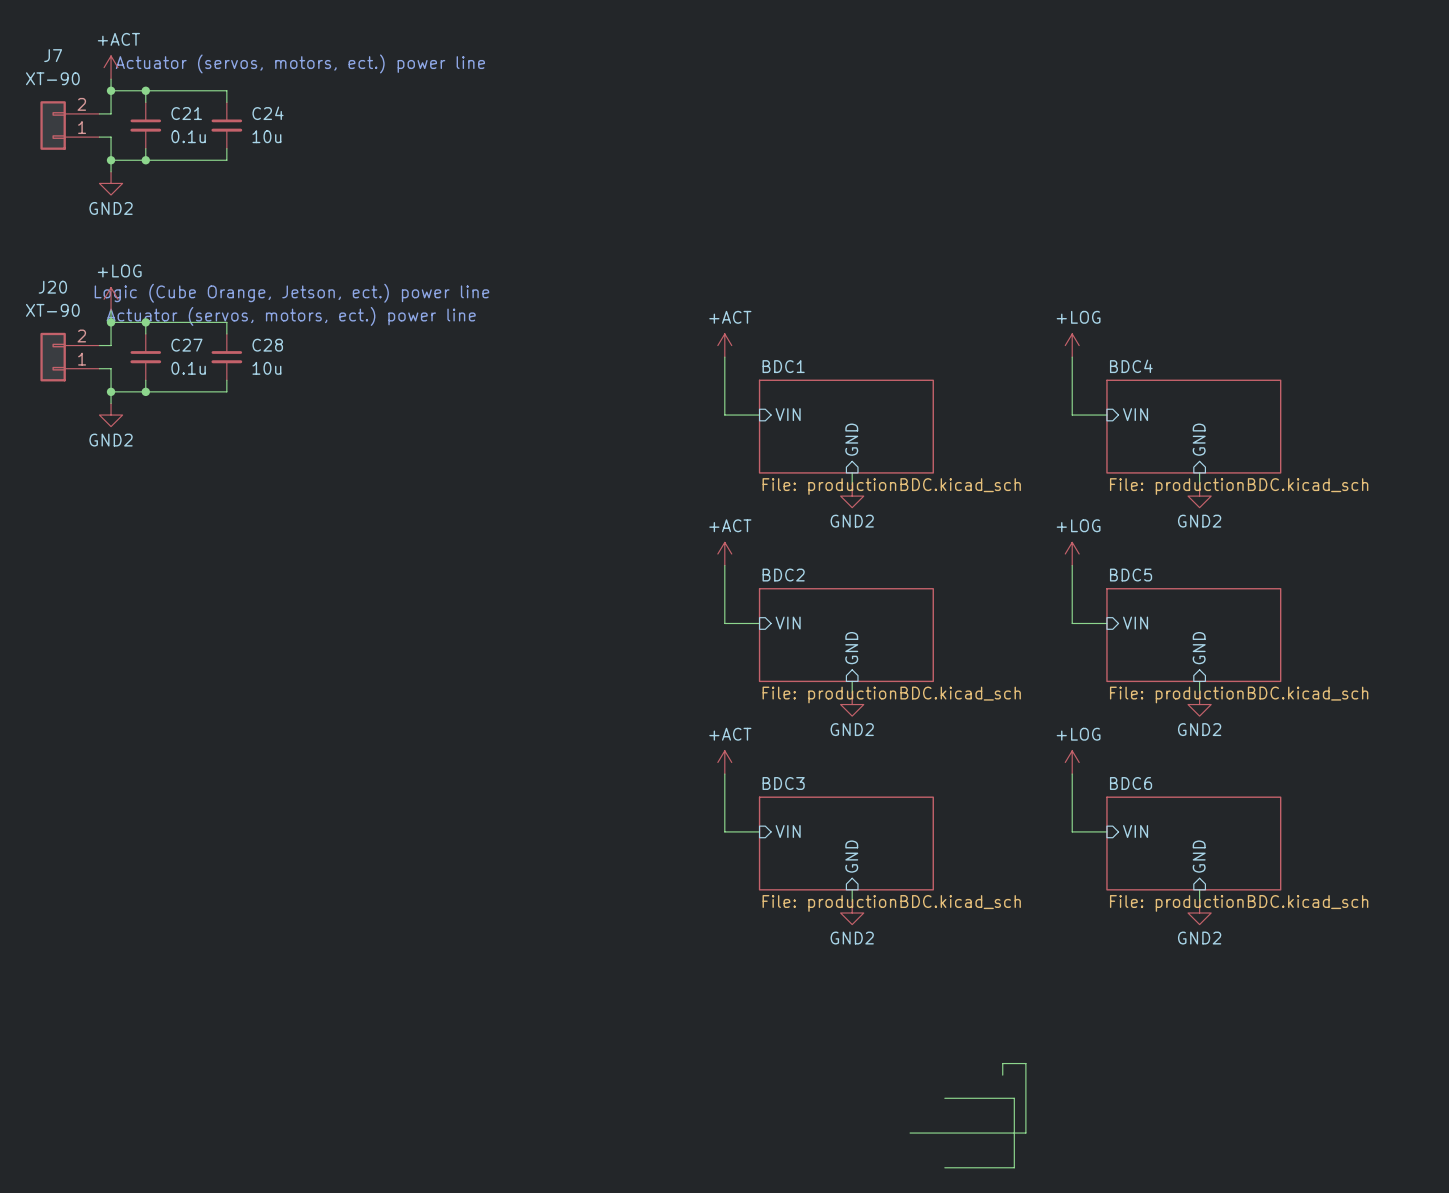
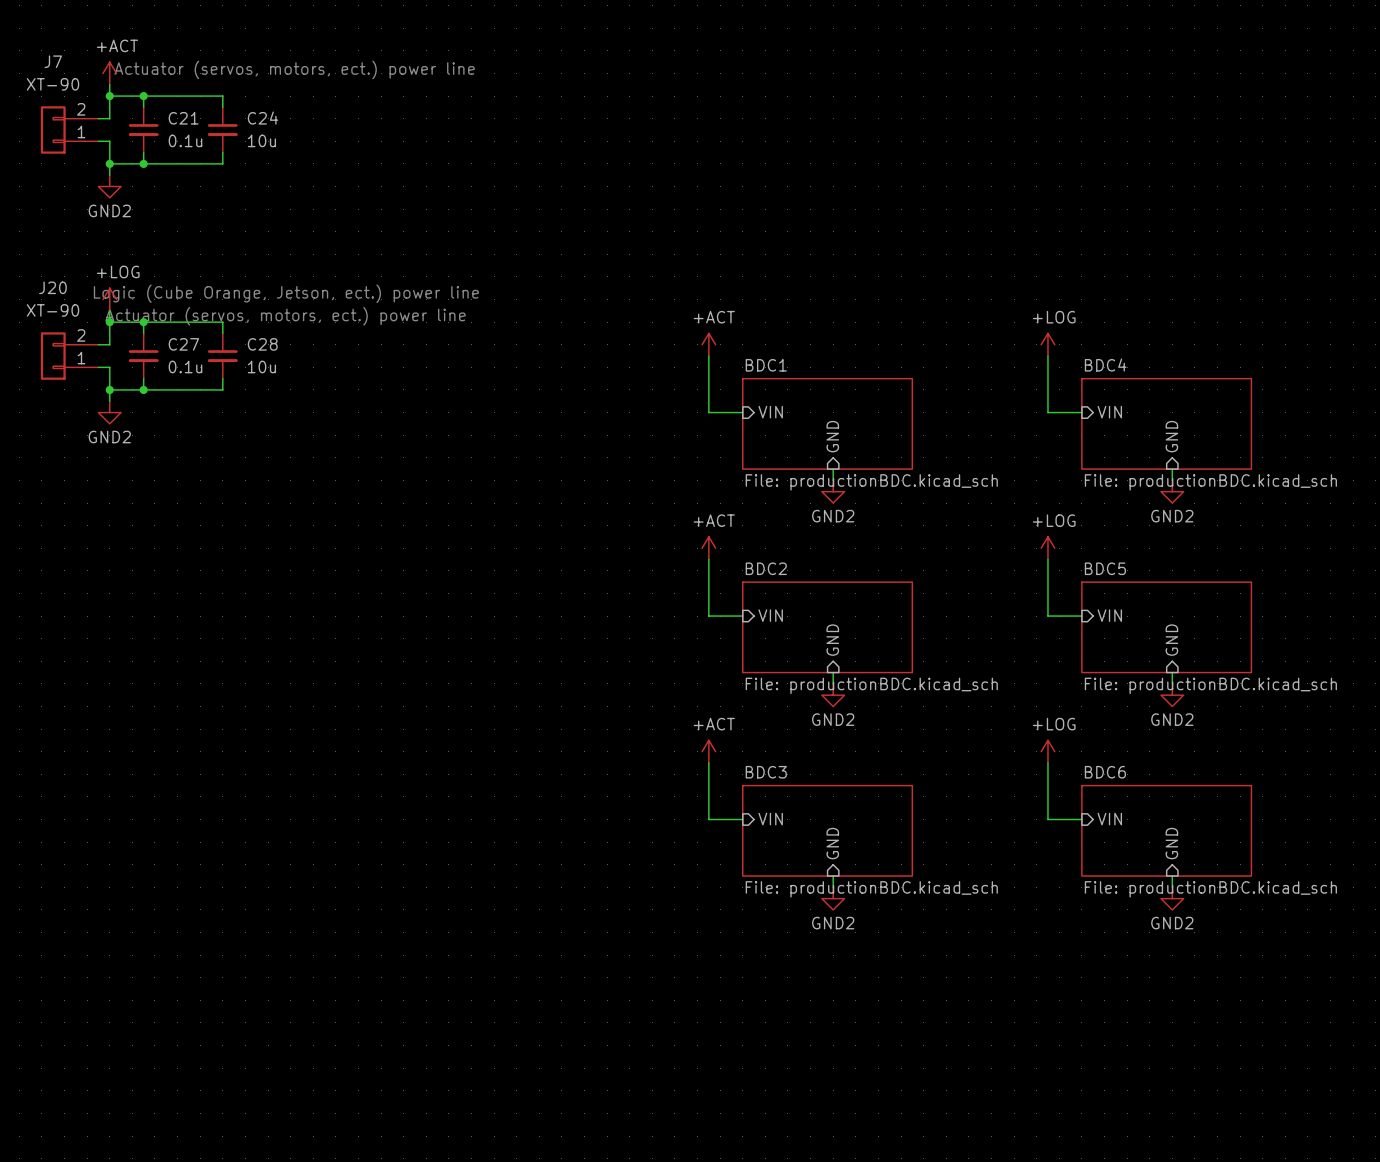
wire: (1002, 1075) (1002, 1063) (1025, 1063) (1025, 1133) (910, 1133) -> none
wire: (944, 1098) (1014, 1098) (1014, 1167) (944, 1167) -> none

